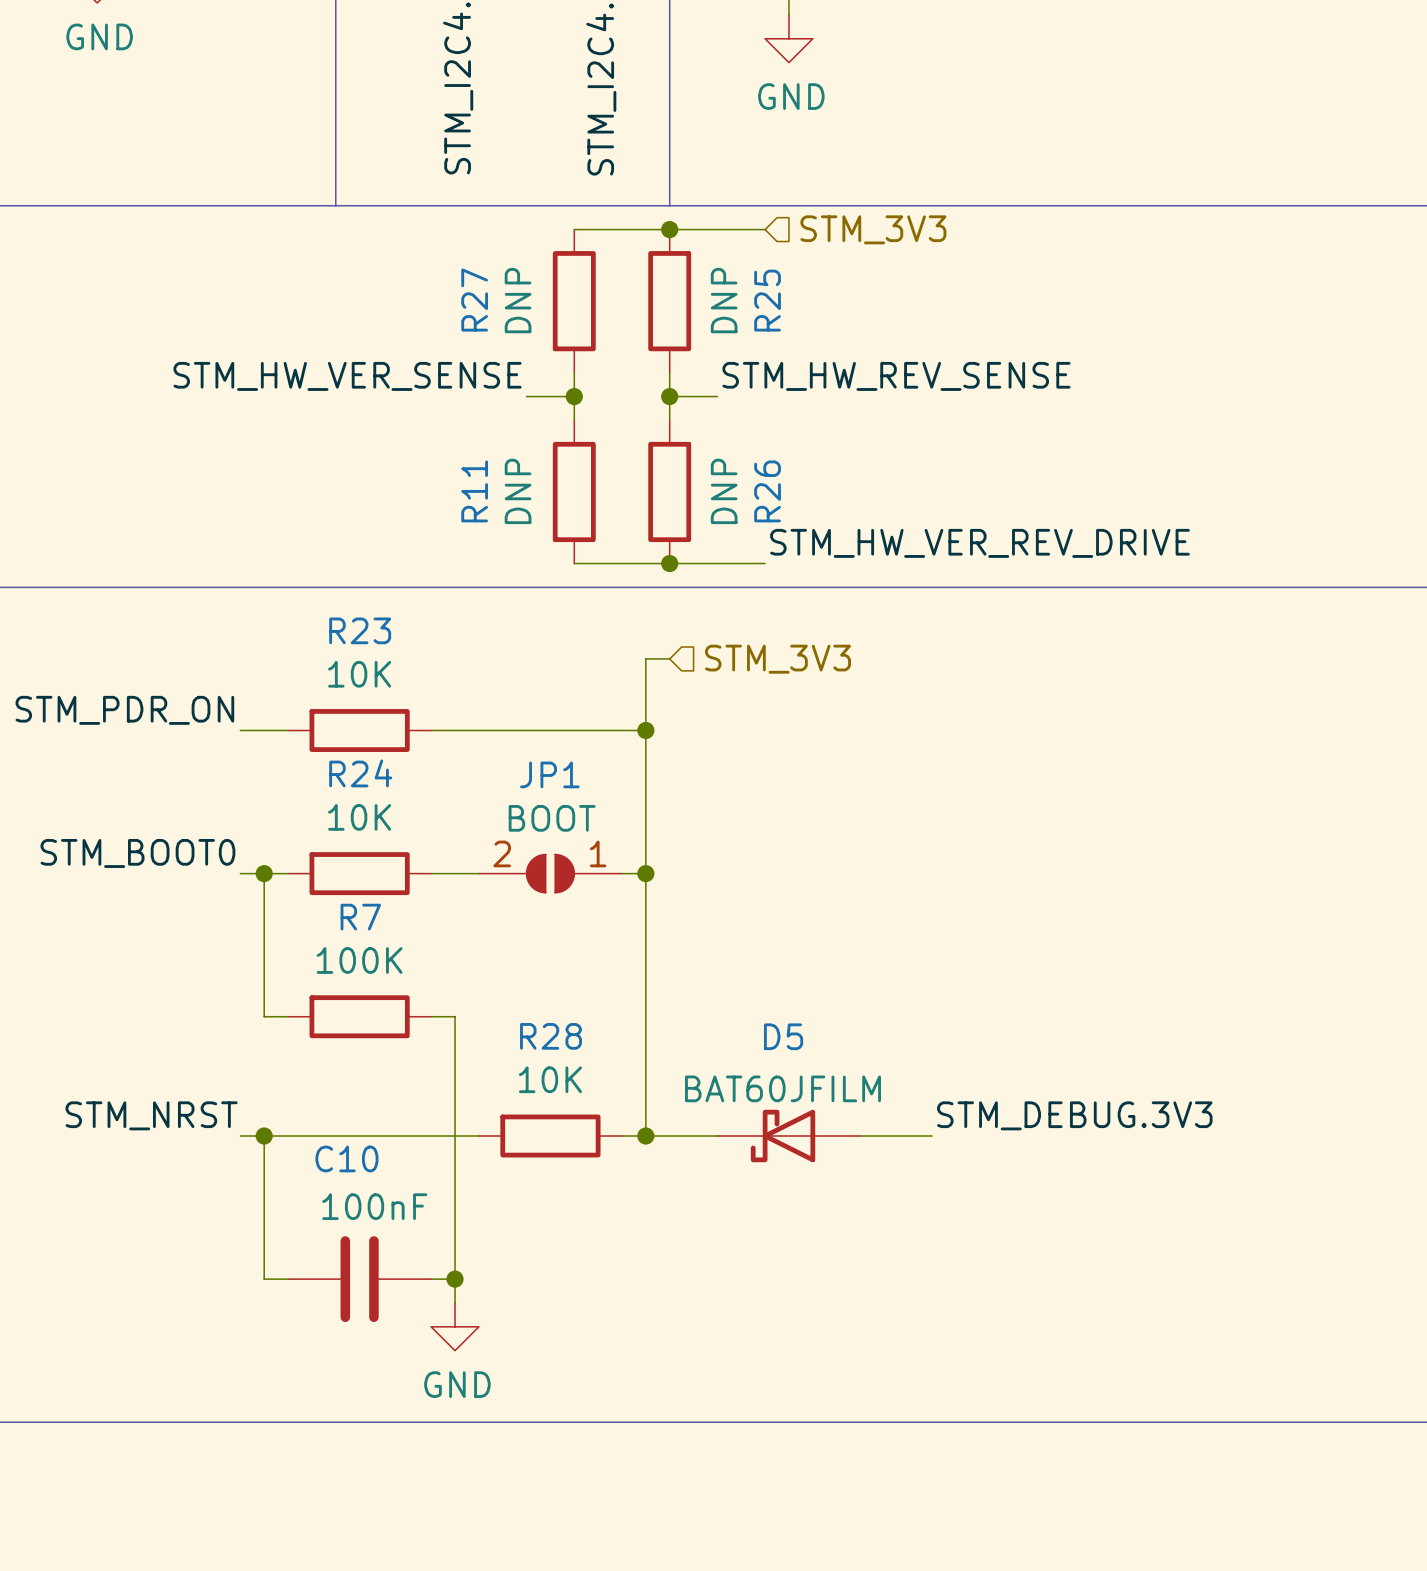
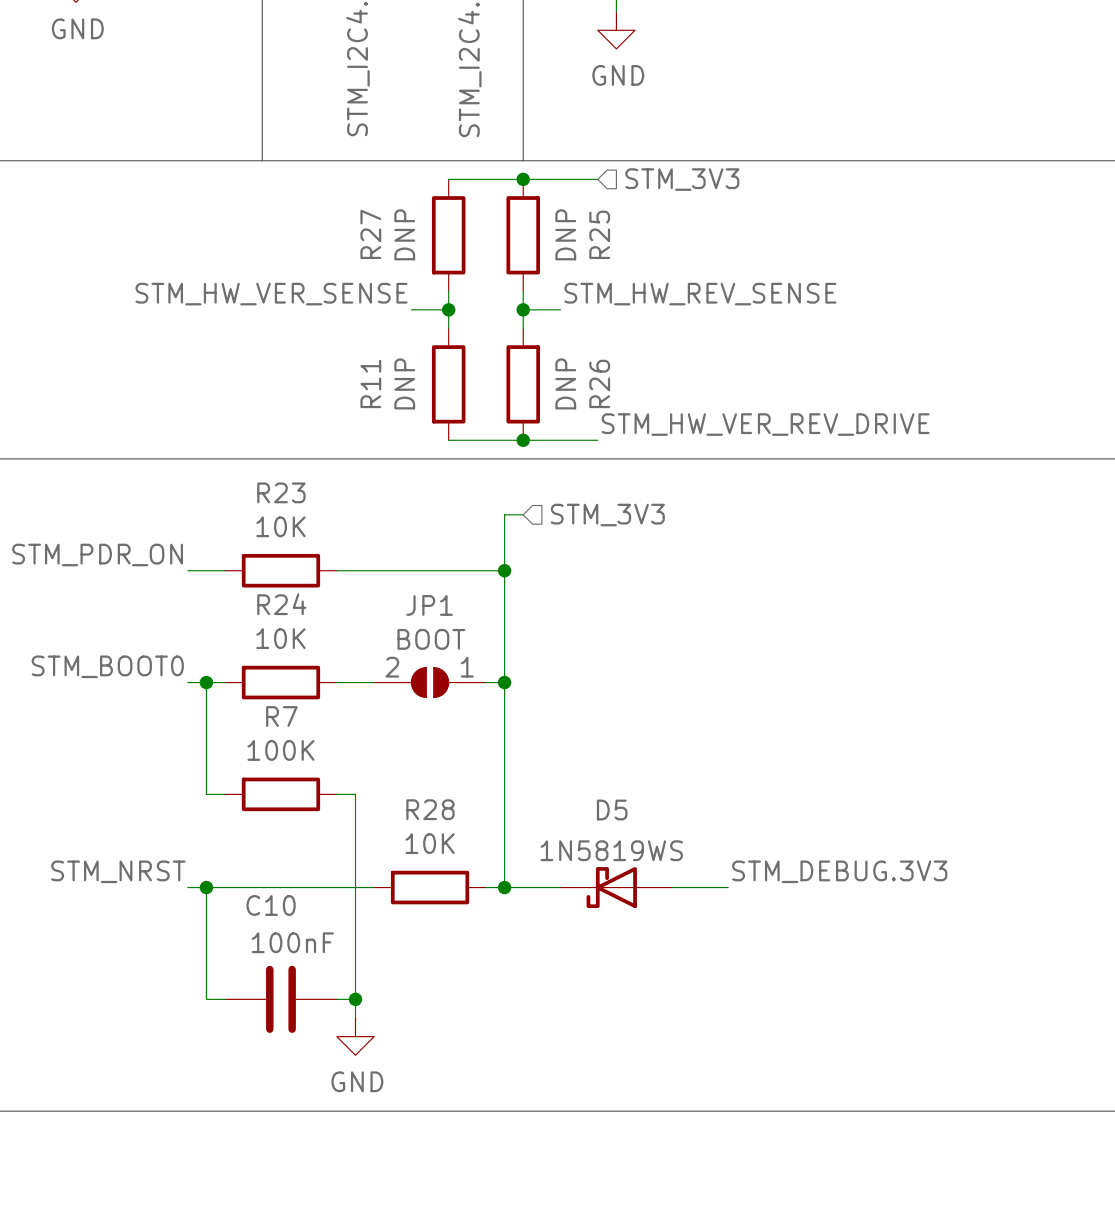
D5 value: BAT60JFILM (783, 1088) -> 1N5819WS (611, 850)

